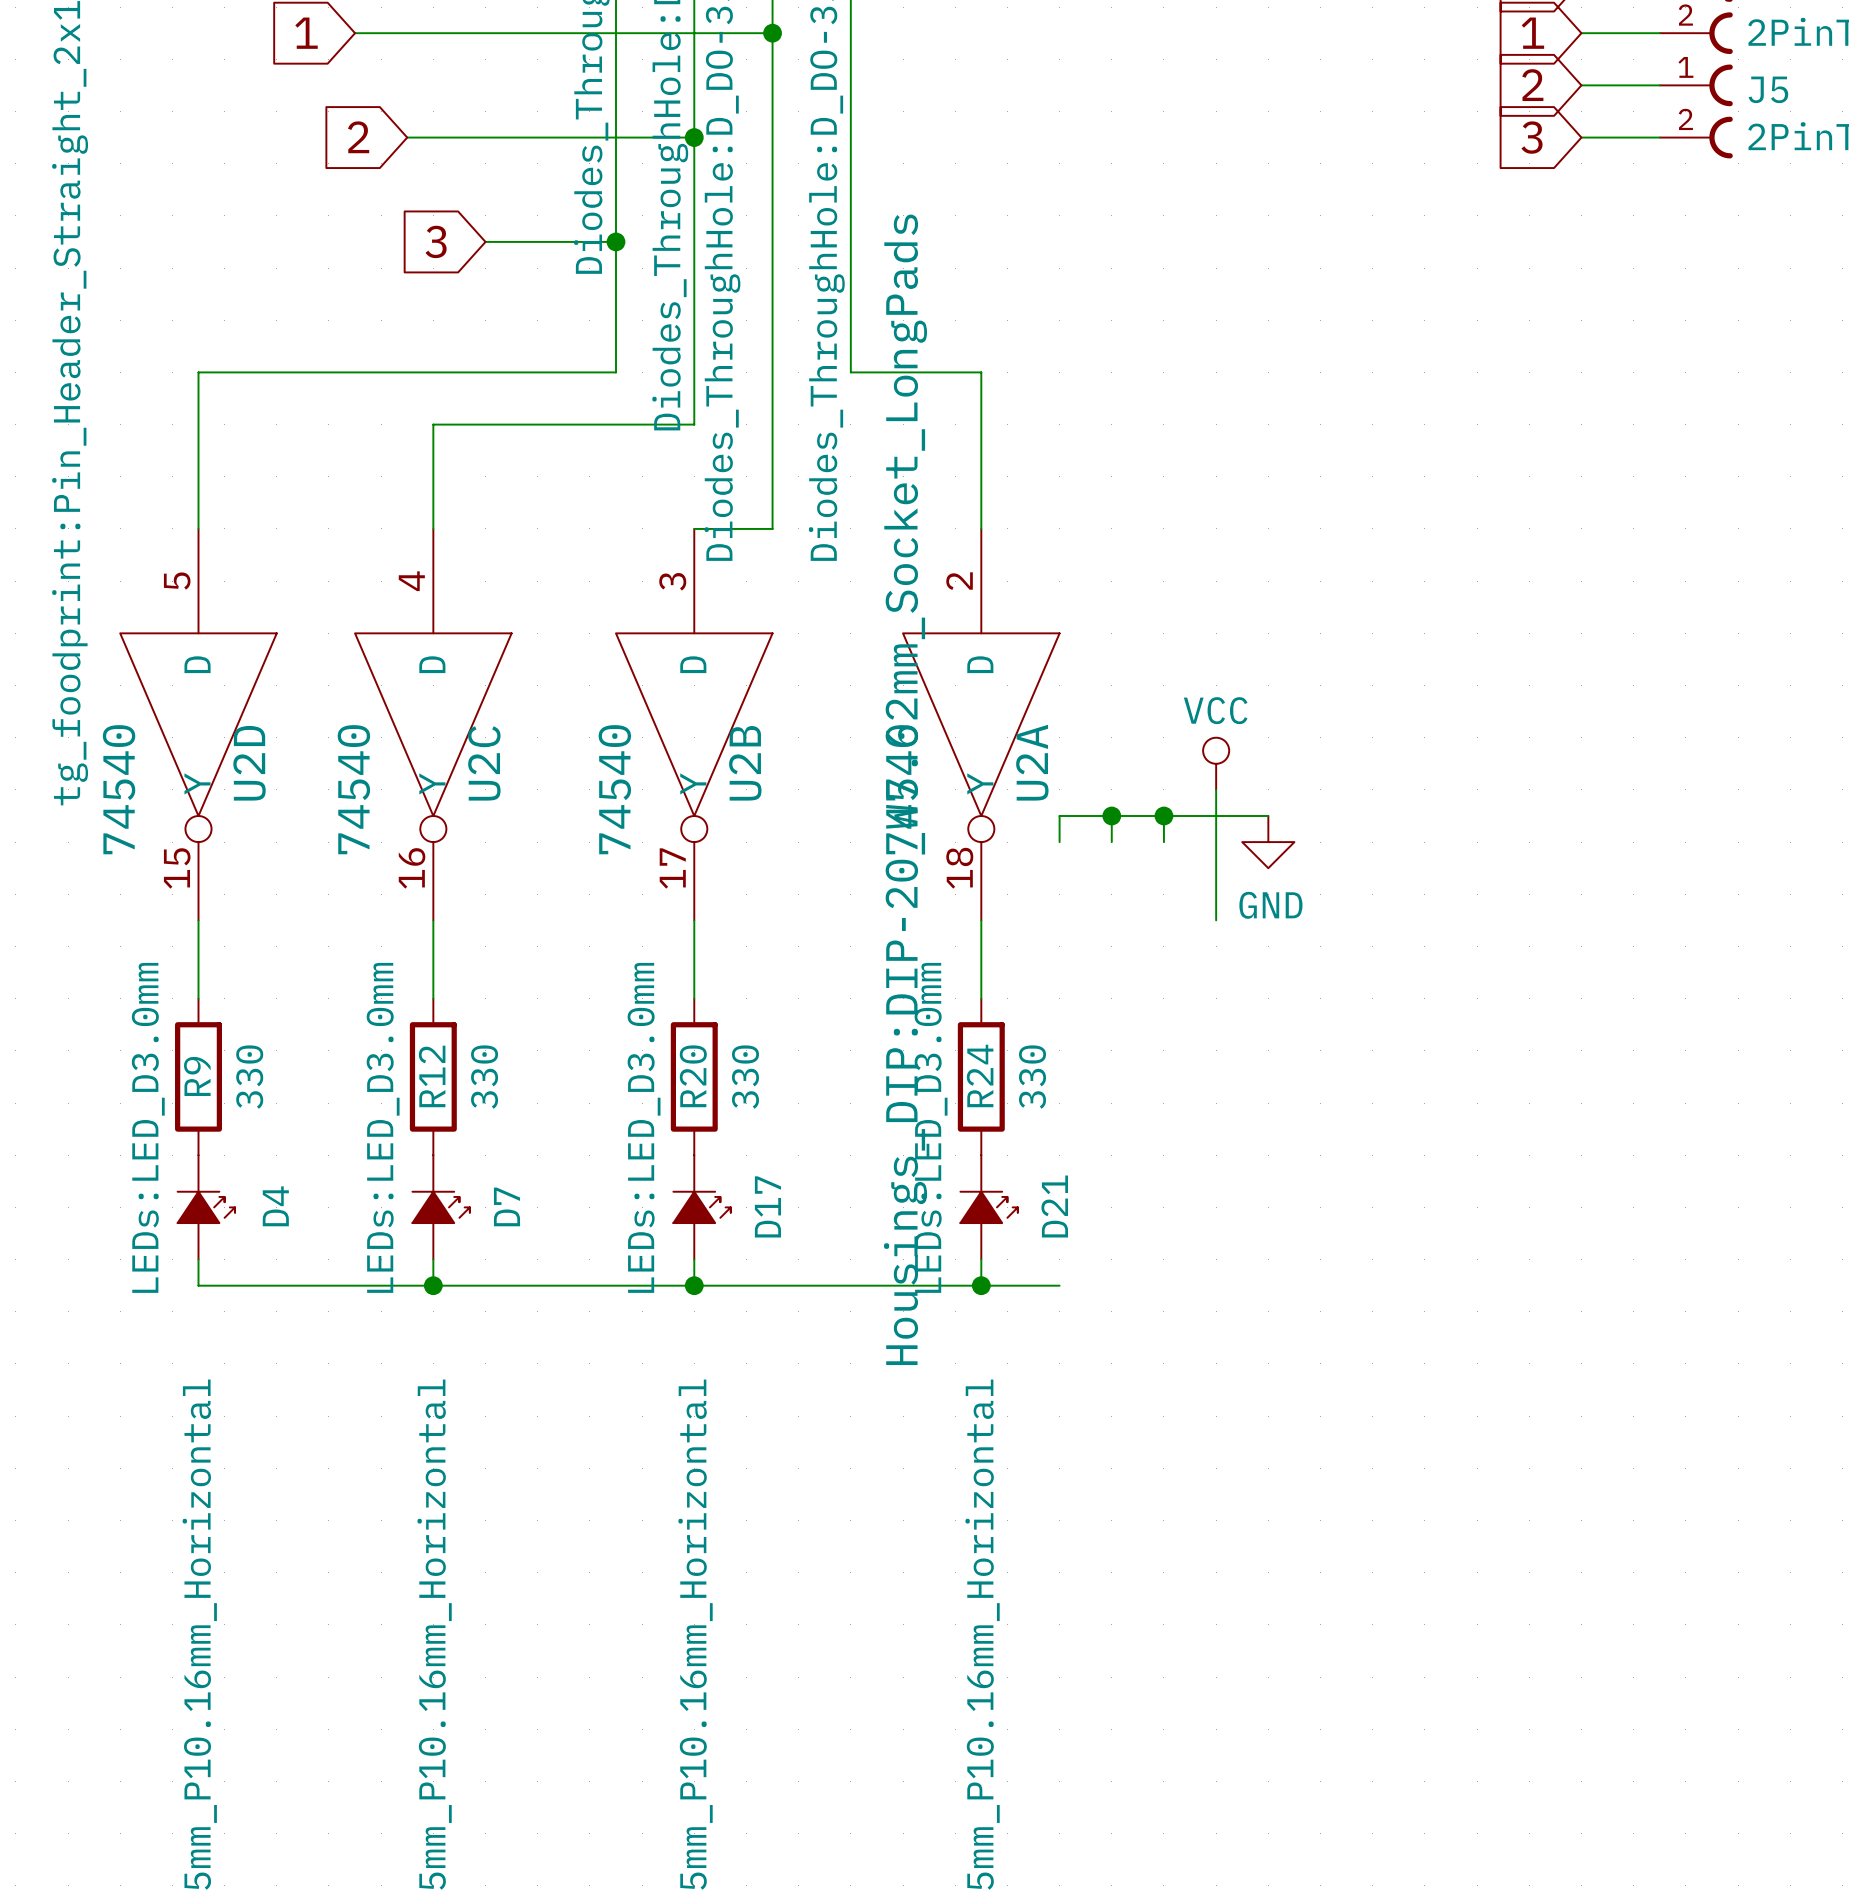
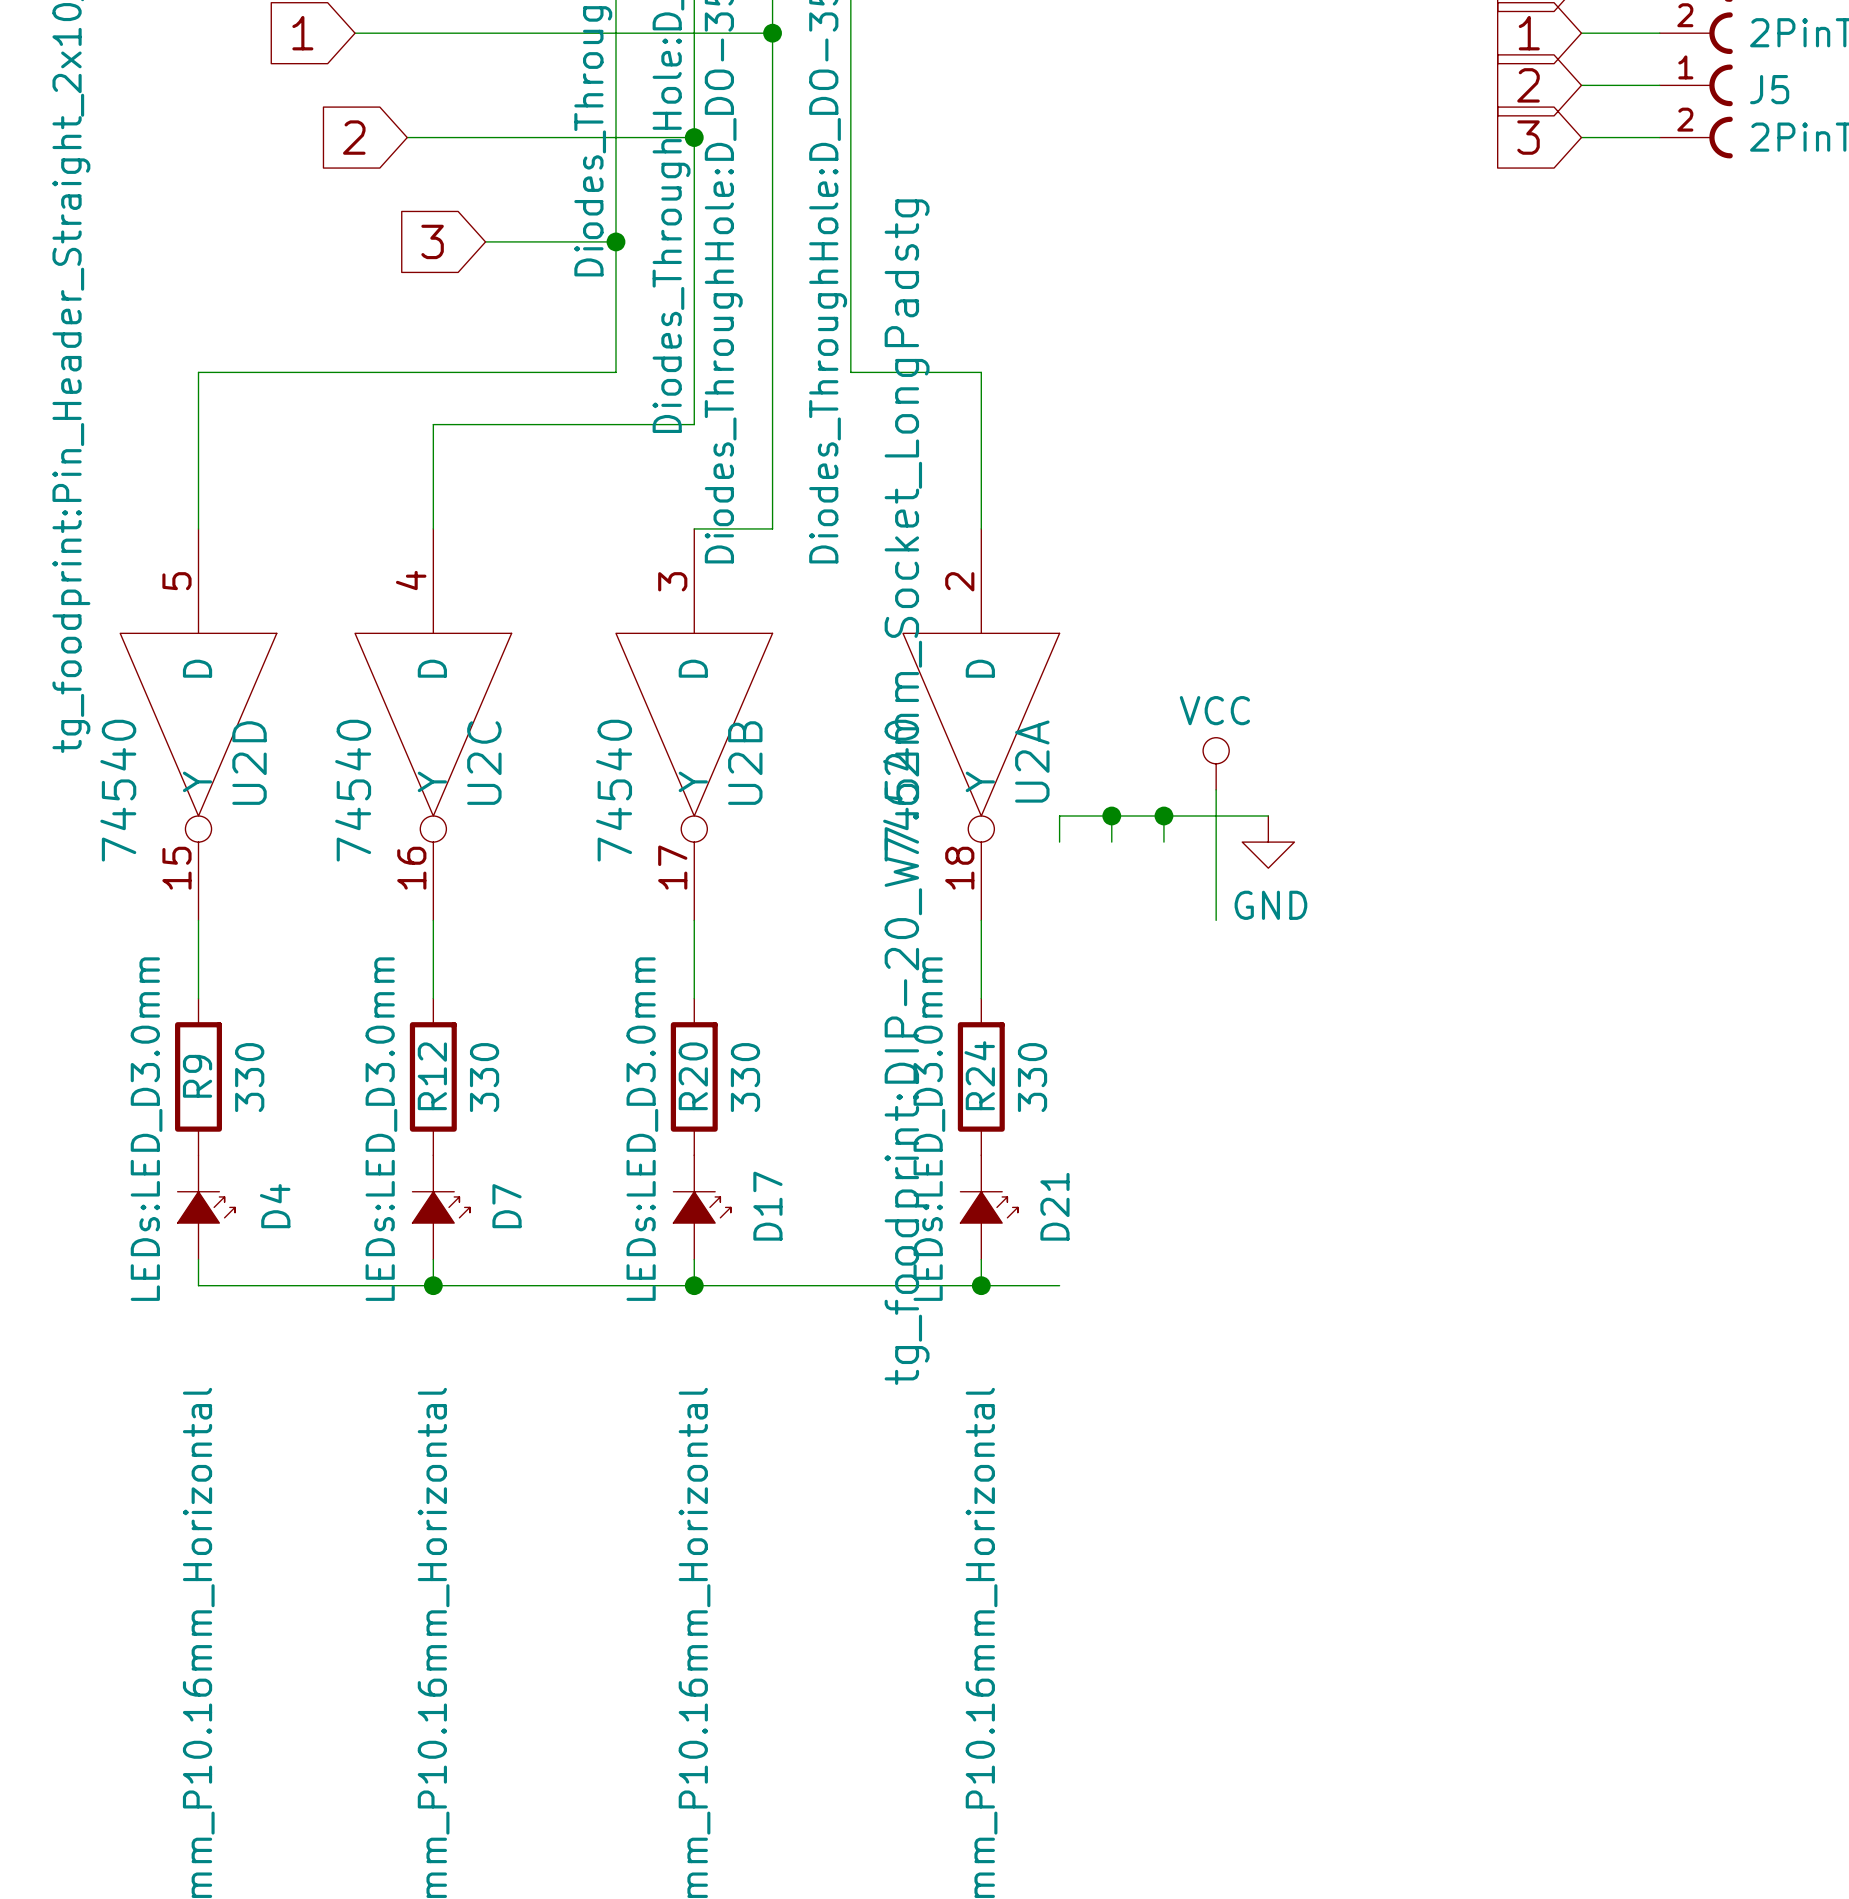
U2A text: Housings_DIP:DIP-20_W7.62mm_Socket_LongPads (905, 789) -> tg_foodprint:DIP-20_W7.62mm_Socket_LongPadstg (907, 792)

